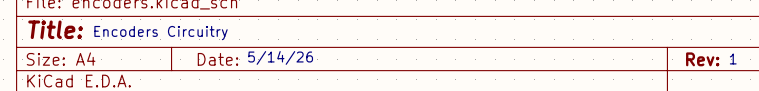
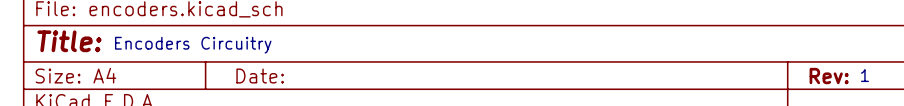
text: 5/14/26 (280, 57) -> none

